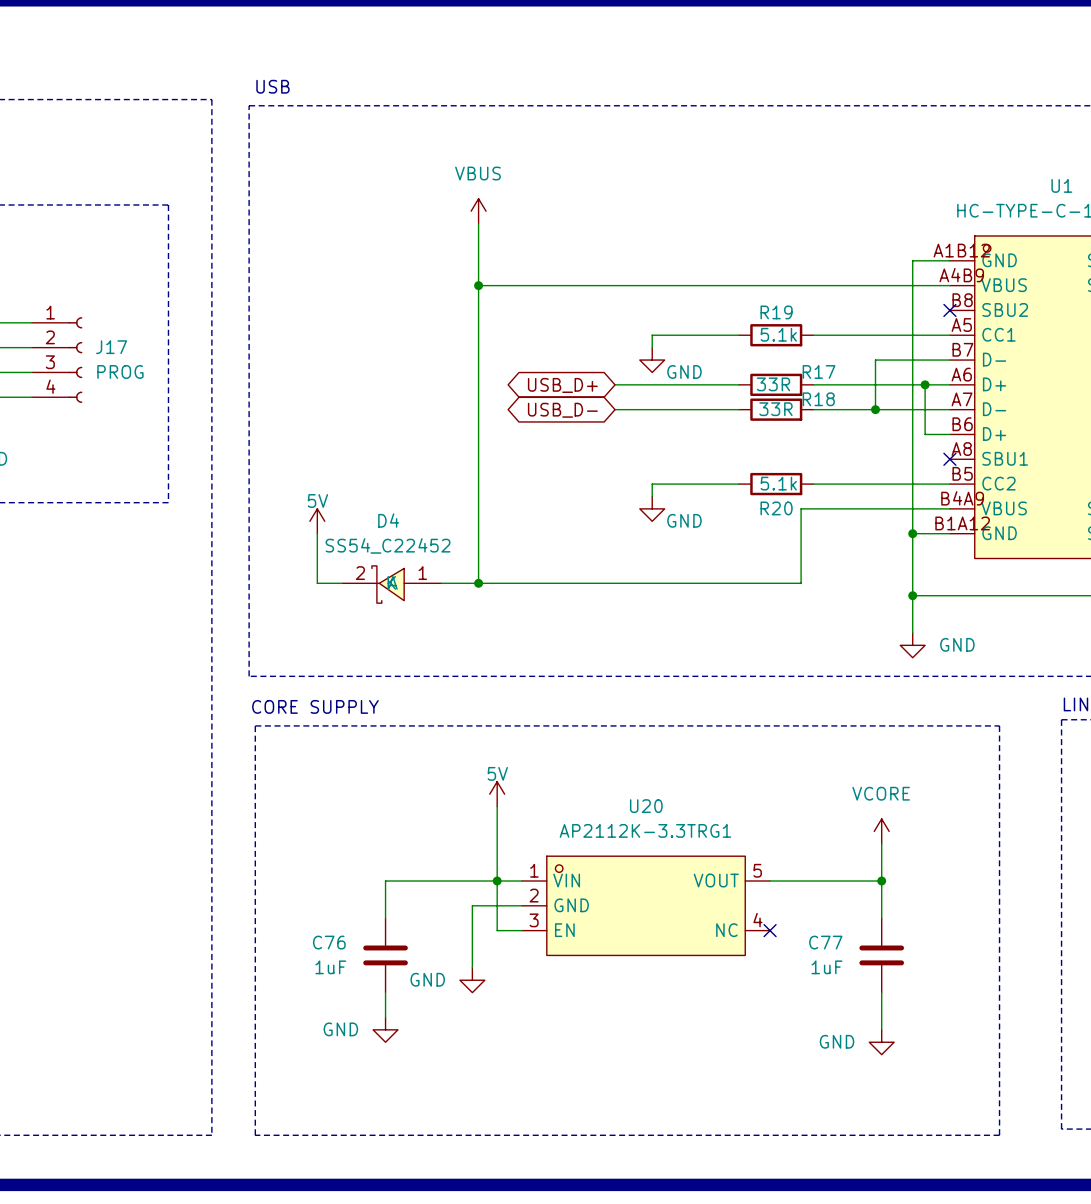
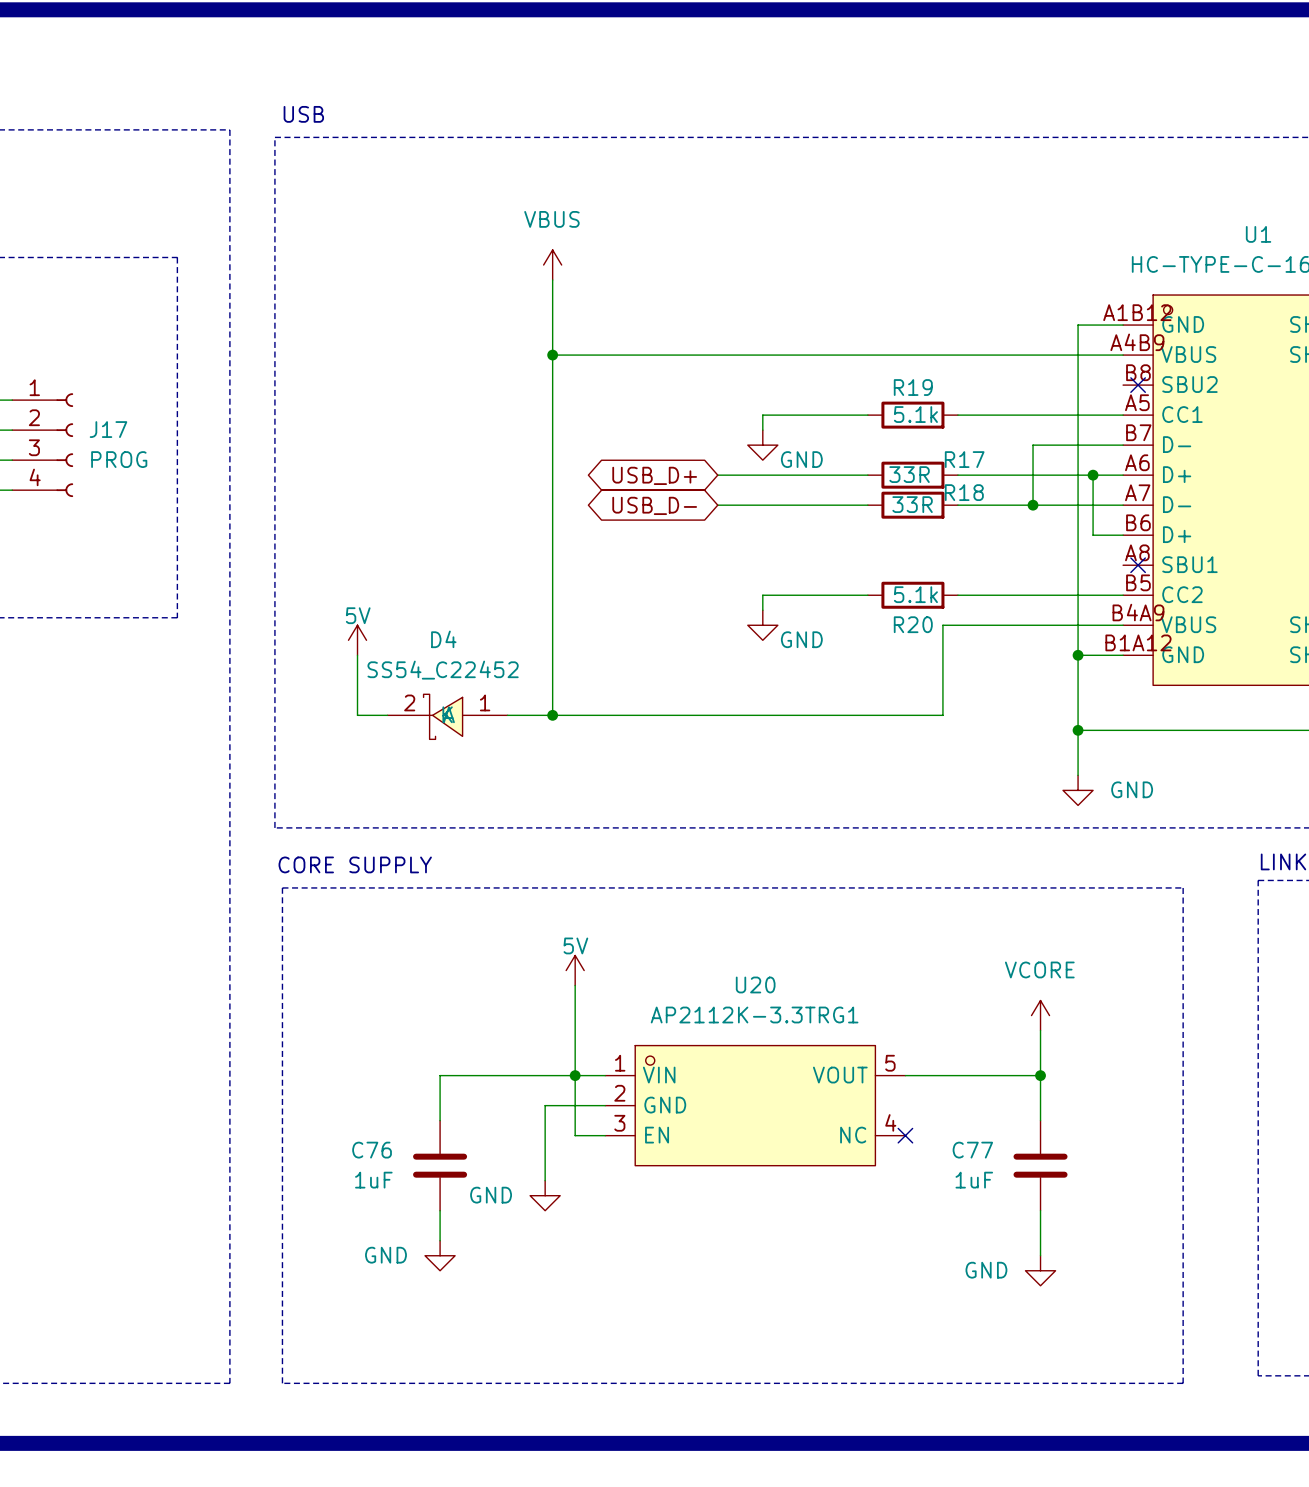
no-connect mark position: (949, 310) -> (1138, 385)
no-connect mark position: (949, 459) -> (1138, 565)

